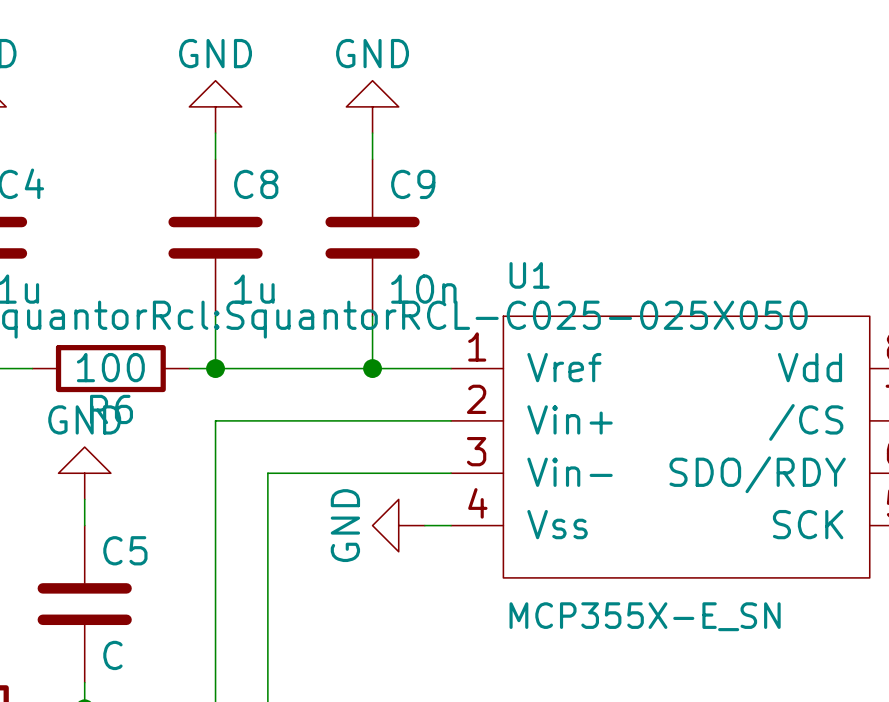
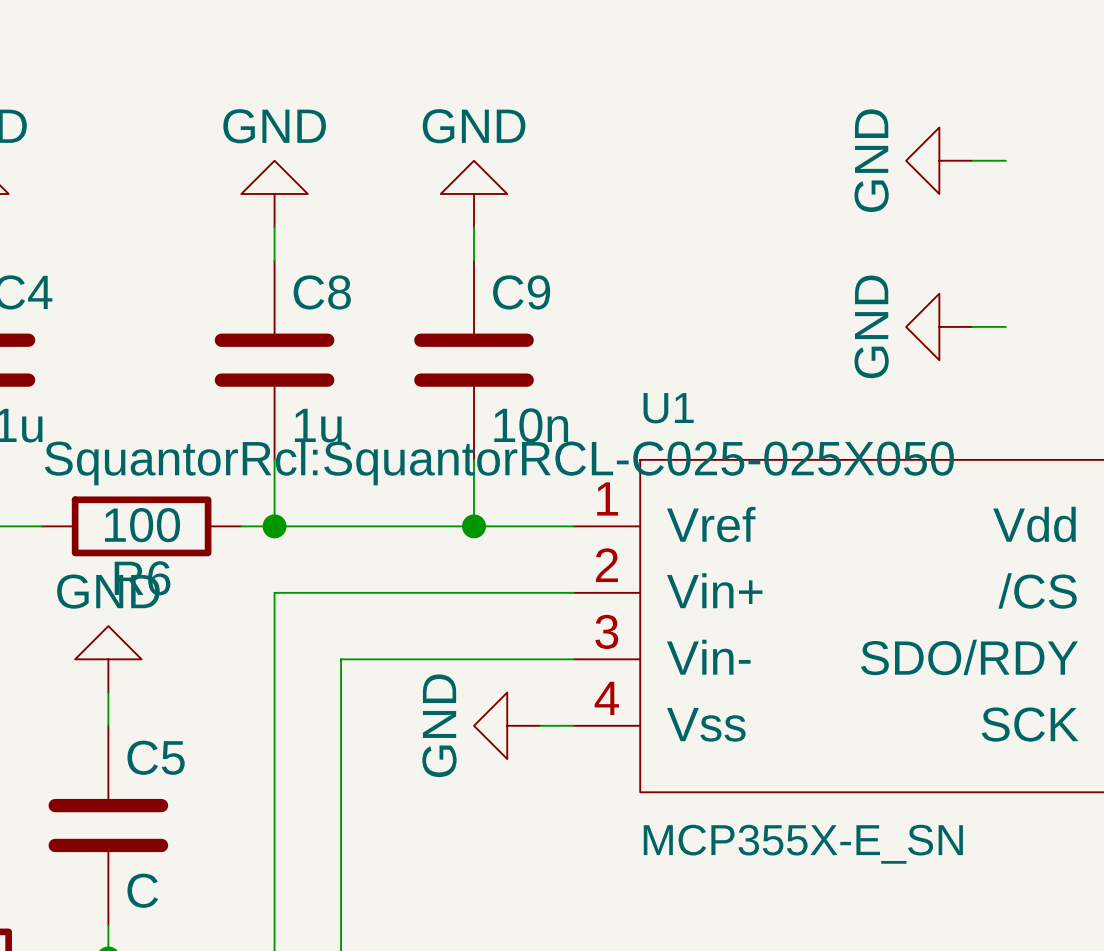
power symbol: none -> GND (939, 160)
wire: none -> (972, 160) (1005, 160)
power symbol: none -> GND (939, 326)
wire: none -> (972, 326) (1005, 326)

